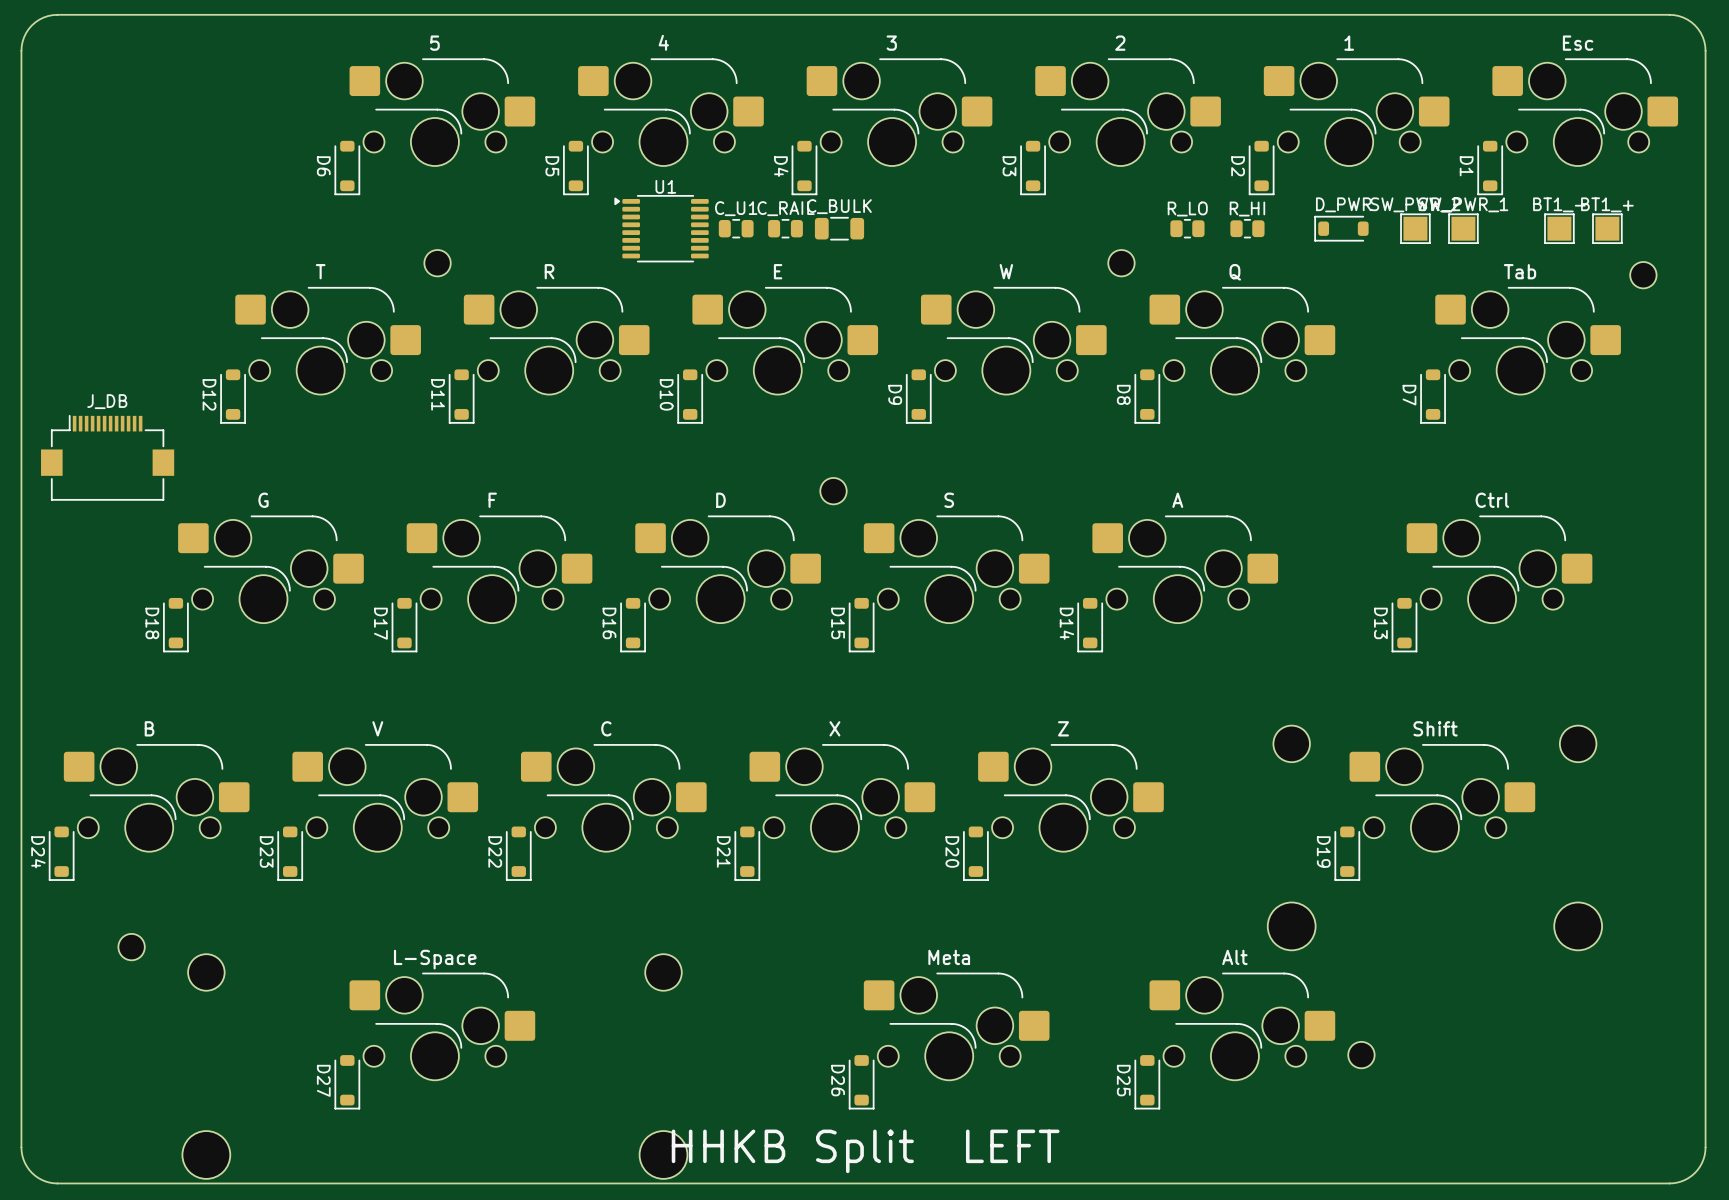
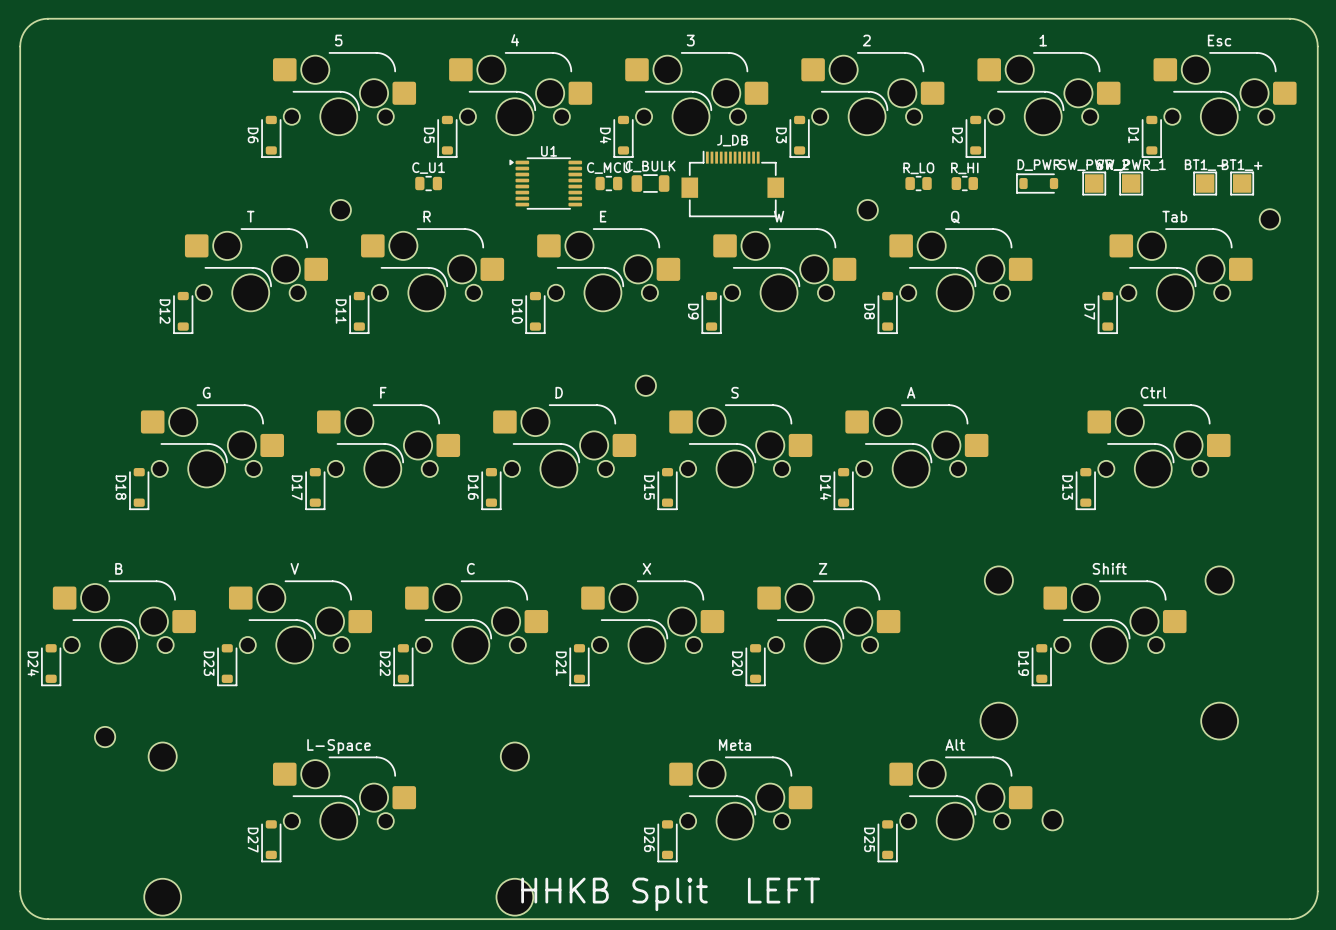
C_RAIL name: C_RAIL (786, 208) -> C_MCU (608, 168)
U1 position: (661, 228) -> (545, 183)
C_U1 position: (736, 228) -> (428, 183)
J_DB: none -> (732, 183)
J_DB: (107, 457) -> none

